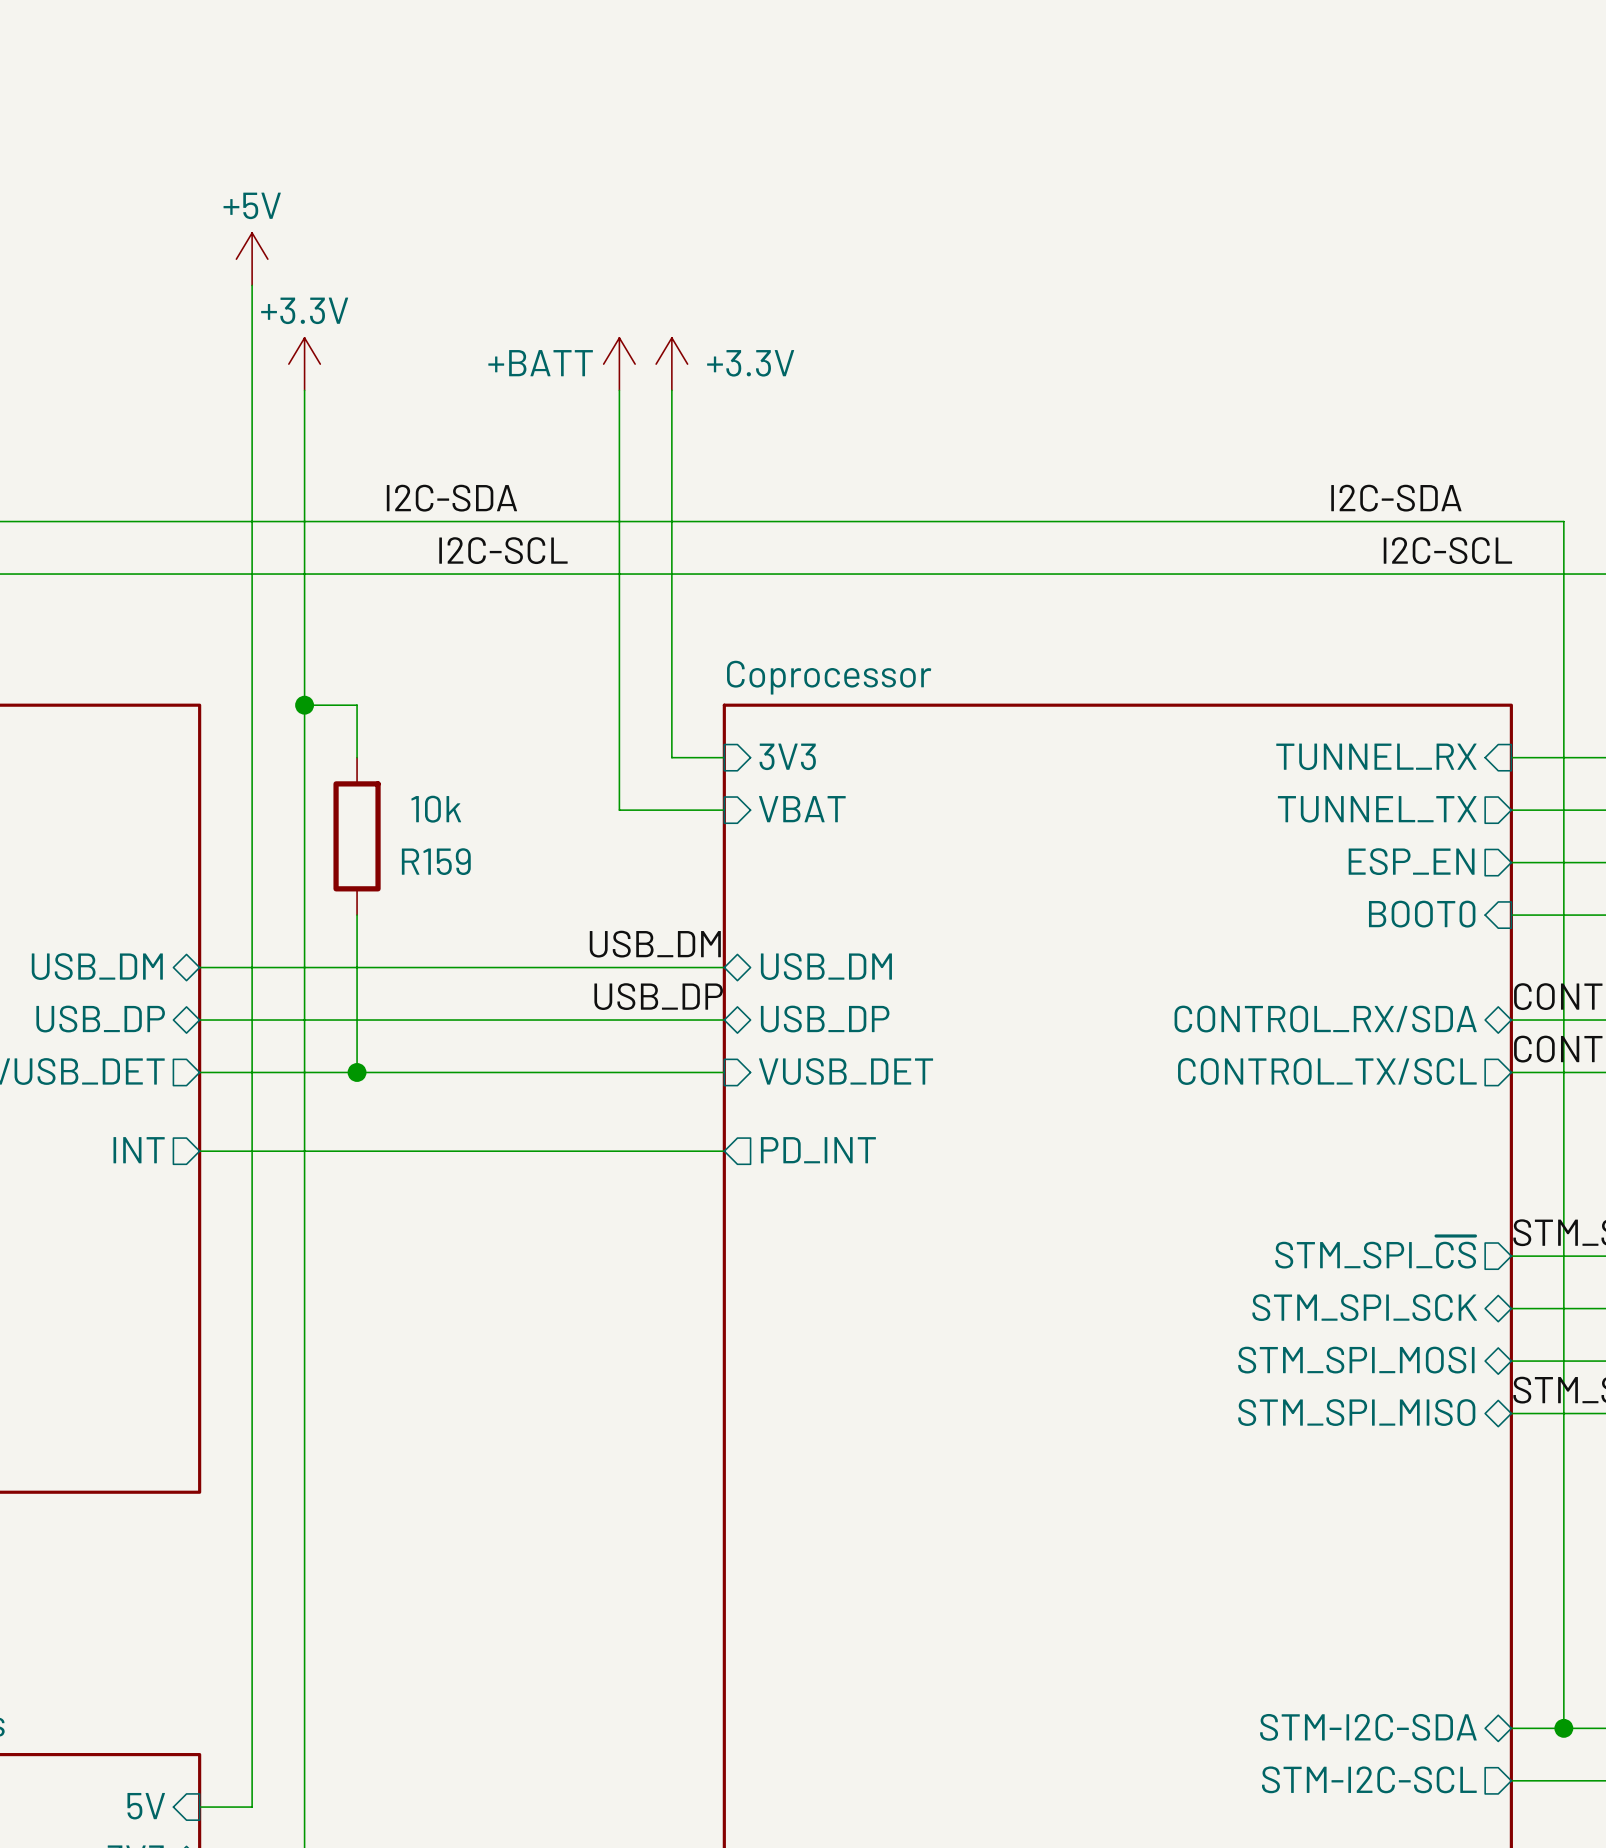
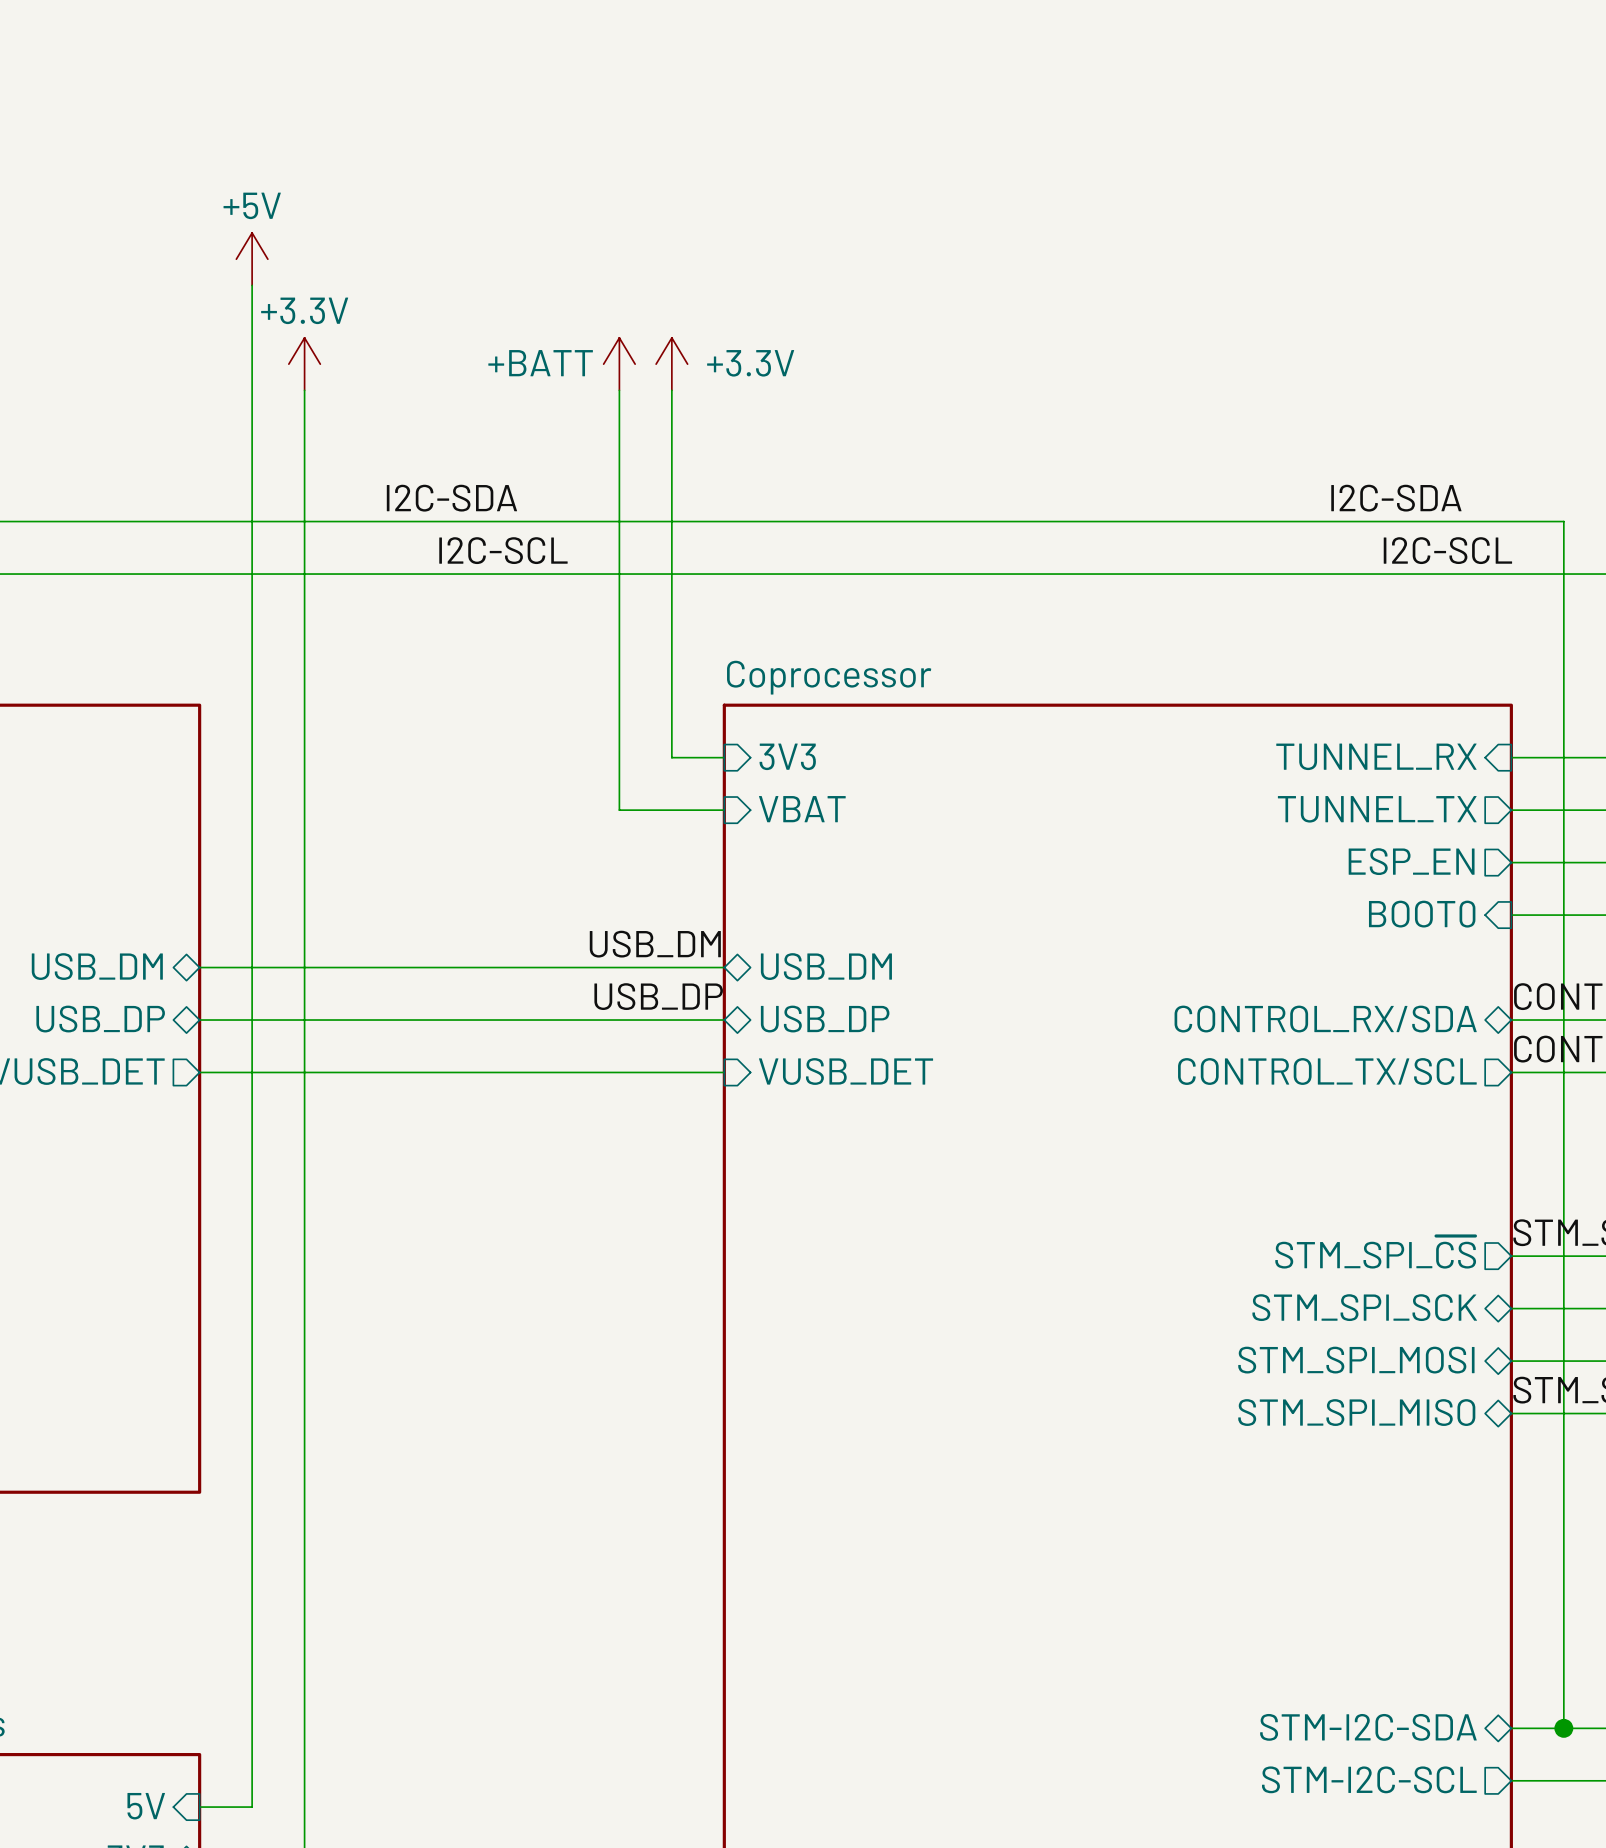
wire: (304, 705) (357, 705) (357, 757) -> none
junction: (304, 705) -> none
R159: 10k (357, 836) -> none
wire: (357, 915) (357, 1072) -> none
junction: (357, 1072) -> none
sheet pin: INT (139, 1150) -> none
sheet pin: PD_INT (818, 1150) -> none
wire: (199, 1151) (724, 1151) -> none

